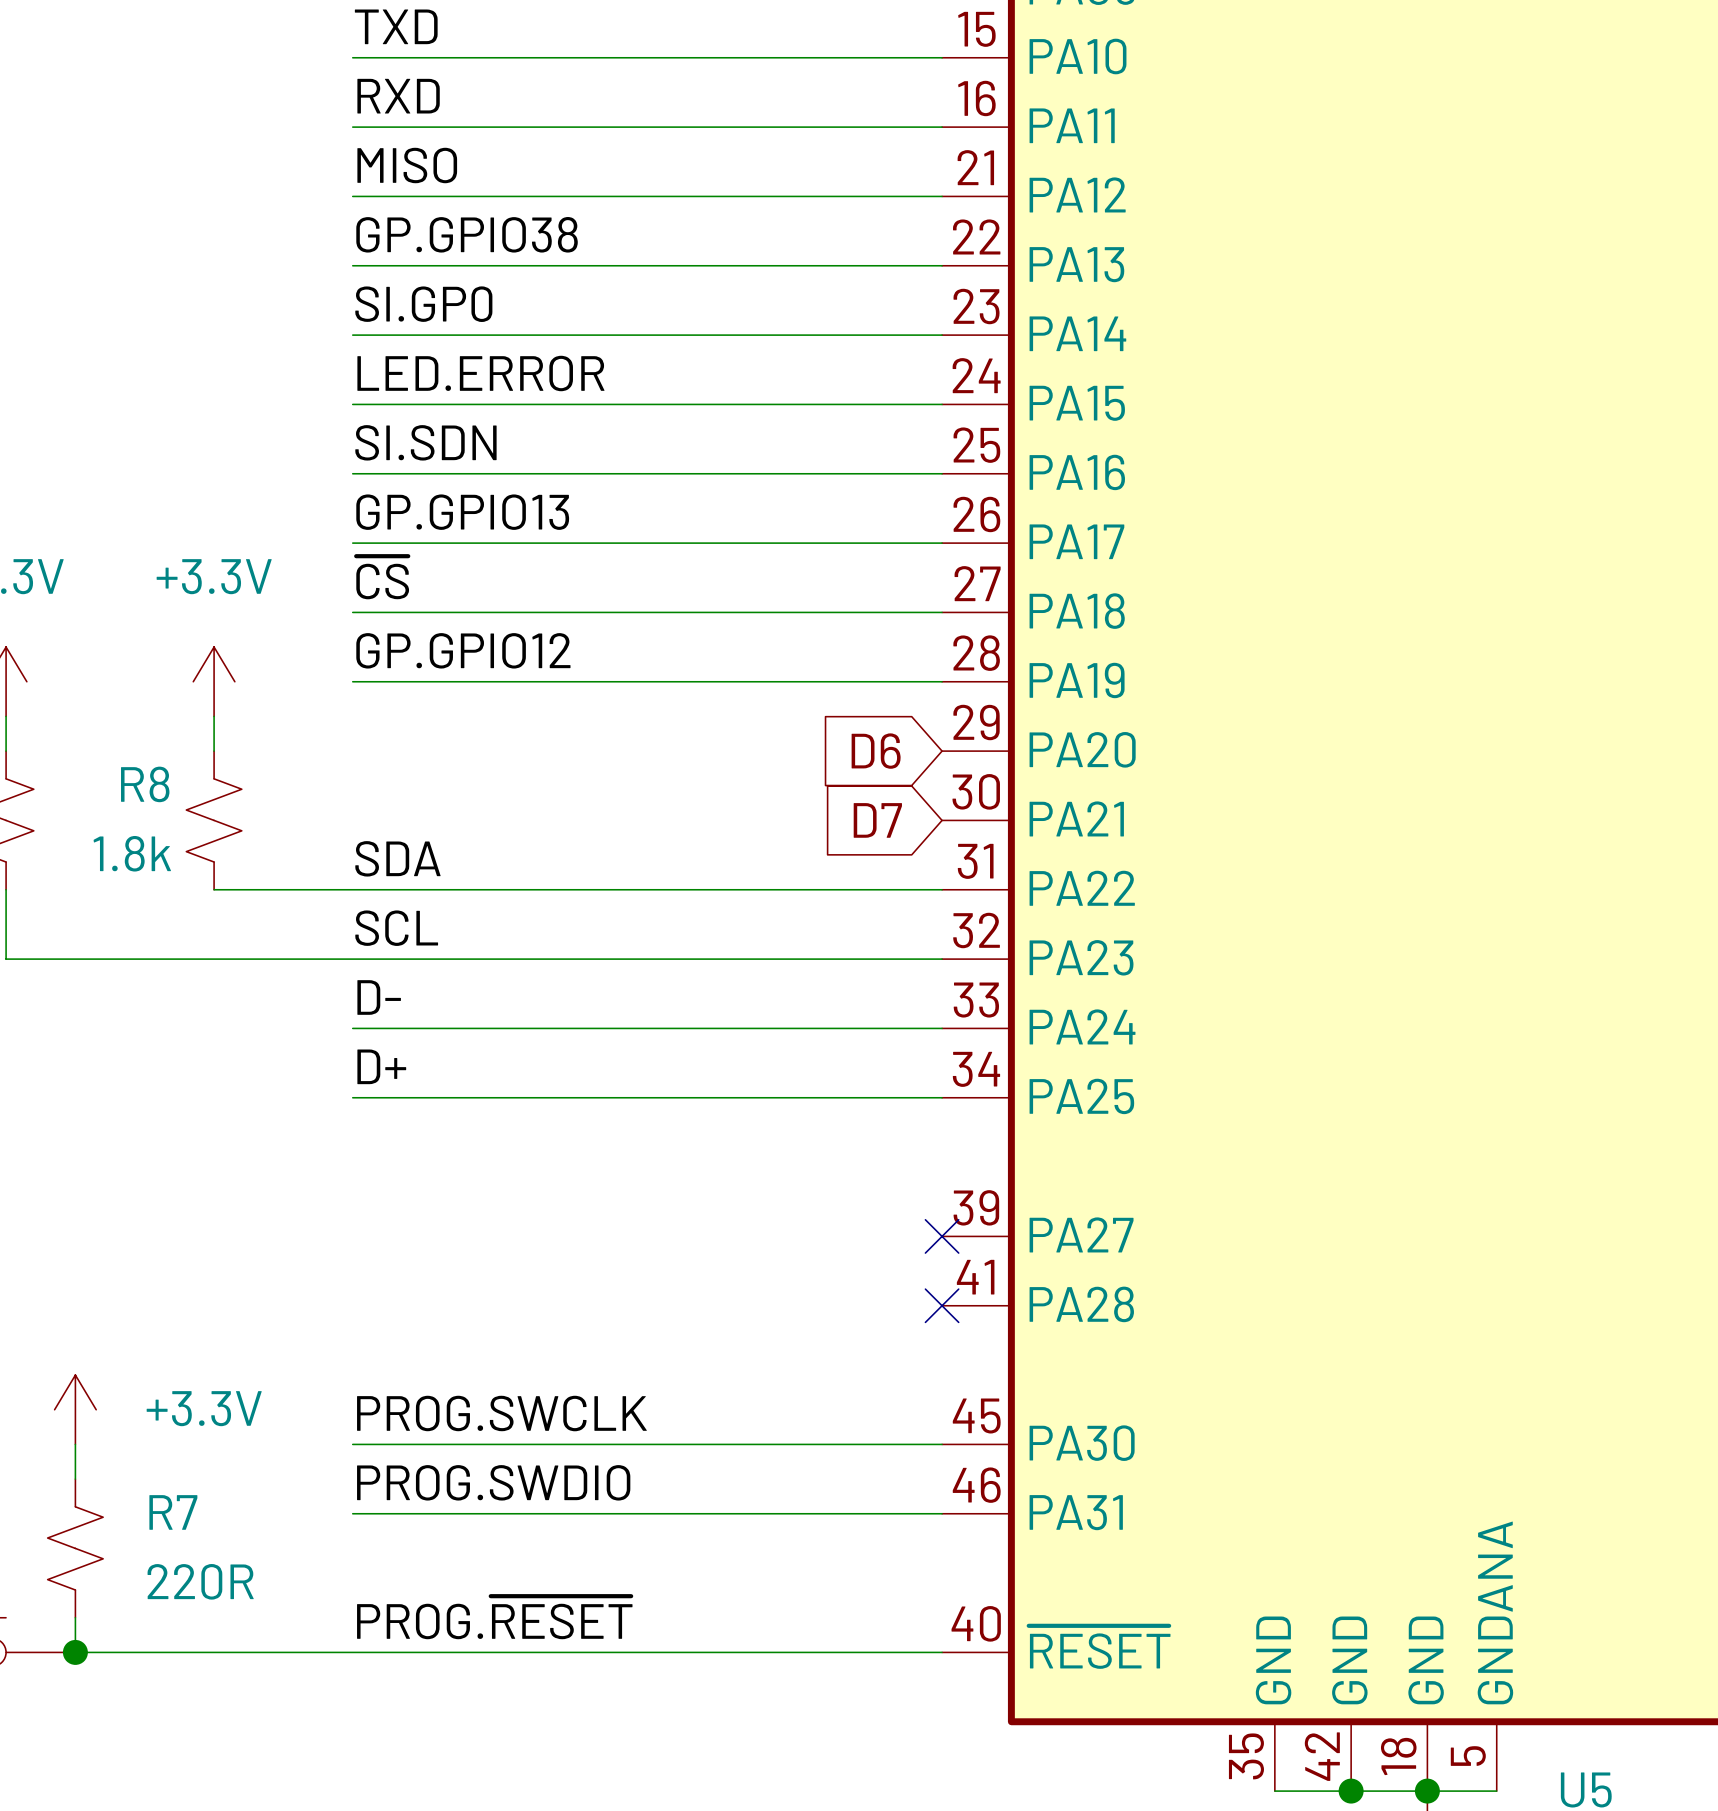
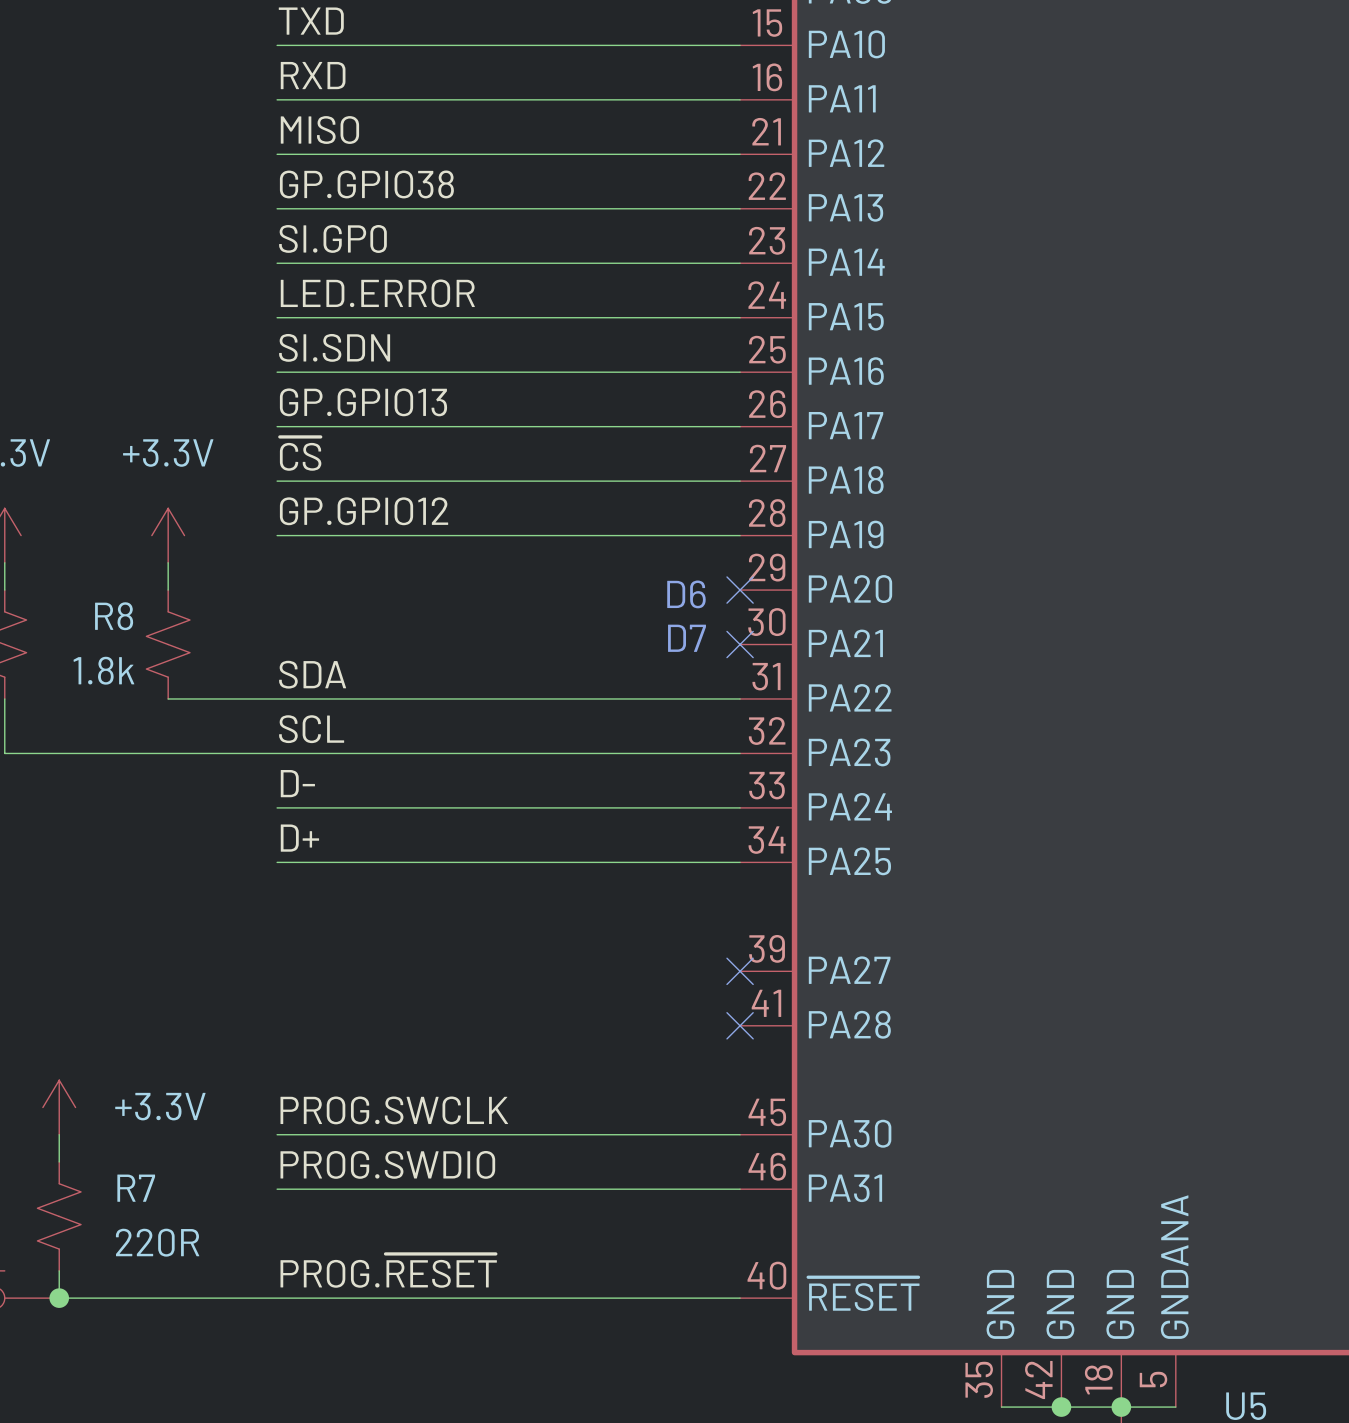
global label: D6 (876, 751) -> none
no-connect mark: none -> (740, 590)
text: none -> D6 (686, 594)
text: none -> D7 (687, 638)
global label: D7 (877, 820) -> none
no-connect mark: none -> (740, 644)

